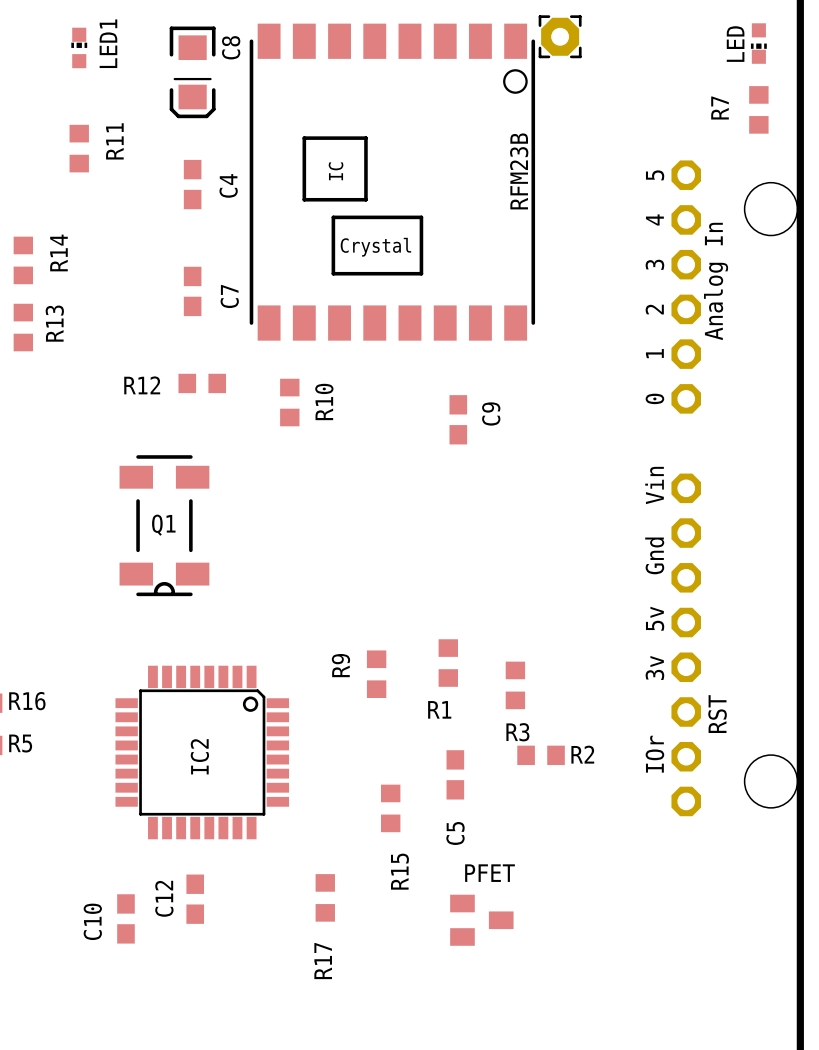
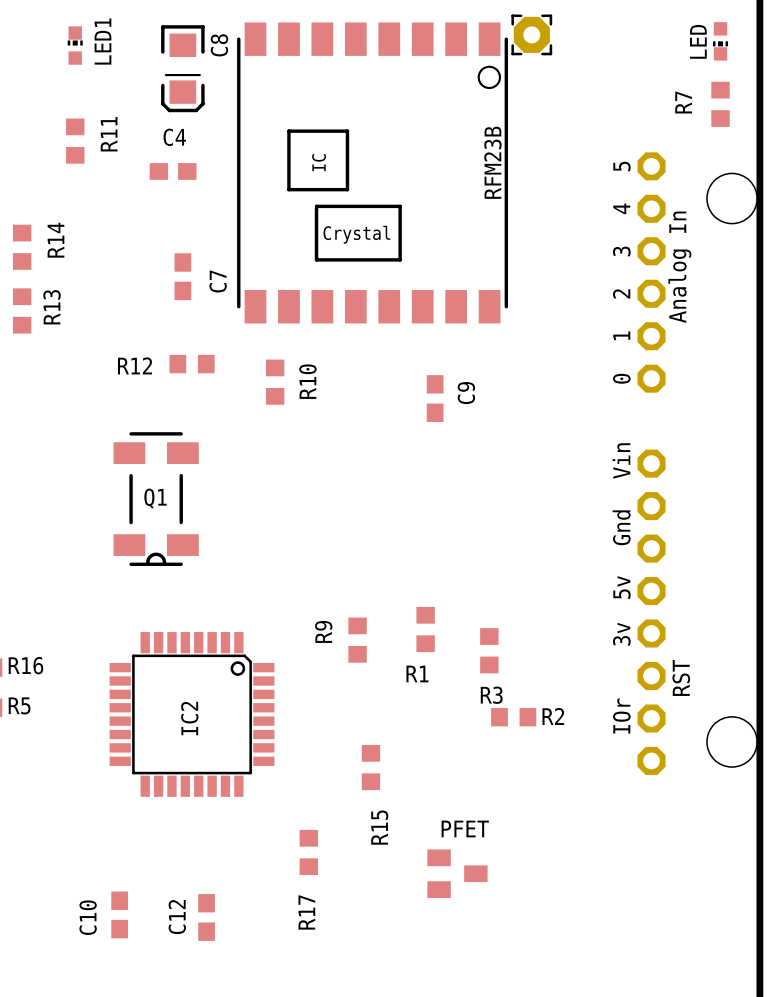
C4 rotation: 0° (192, 184) -> 90° clockwise (173, 171)
C4 name position: C4 (228, 185) -> C4 (174, 137)
C5: (455, 774) -> none
C12 position: (195, 899) -> (206, 917)
C10 position: (125, 918) -> (119, 914)

